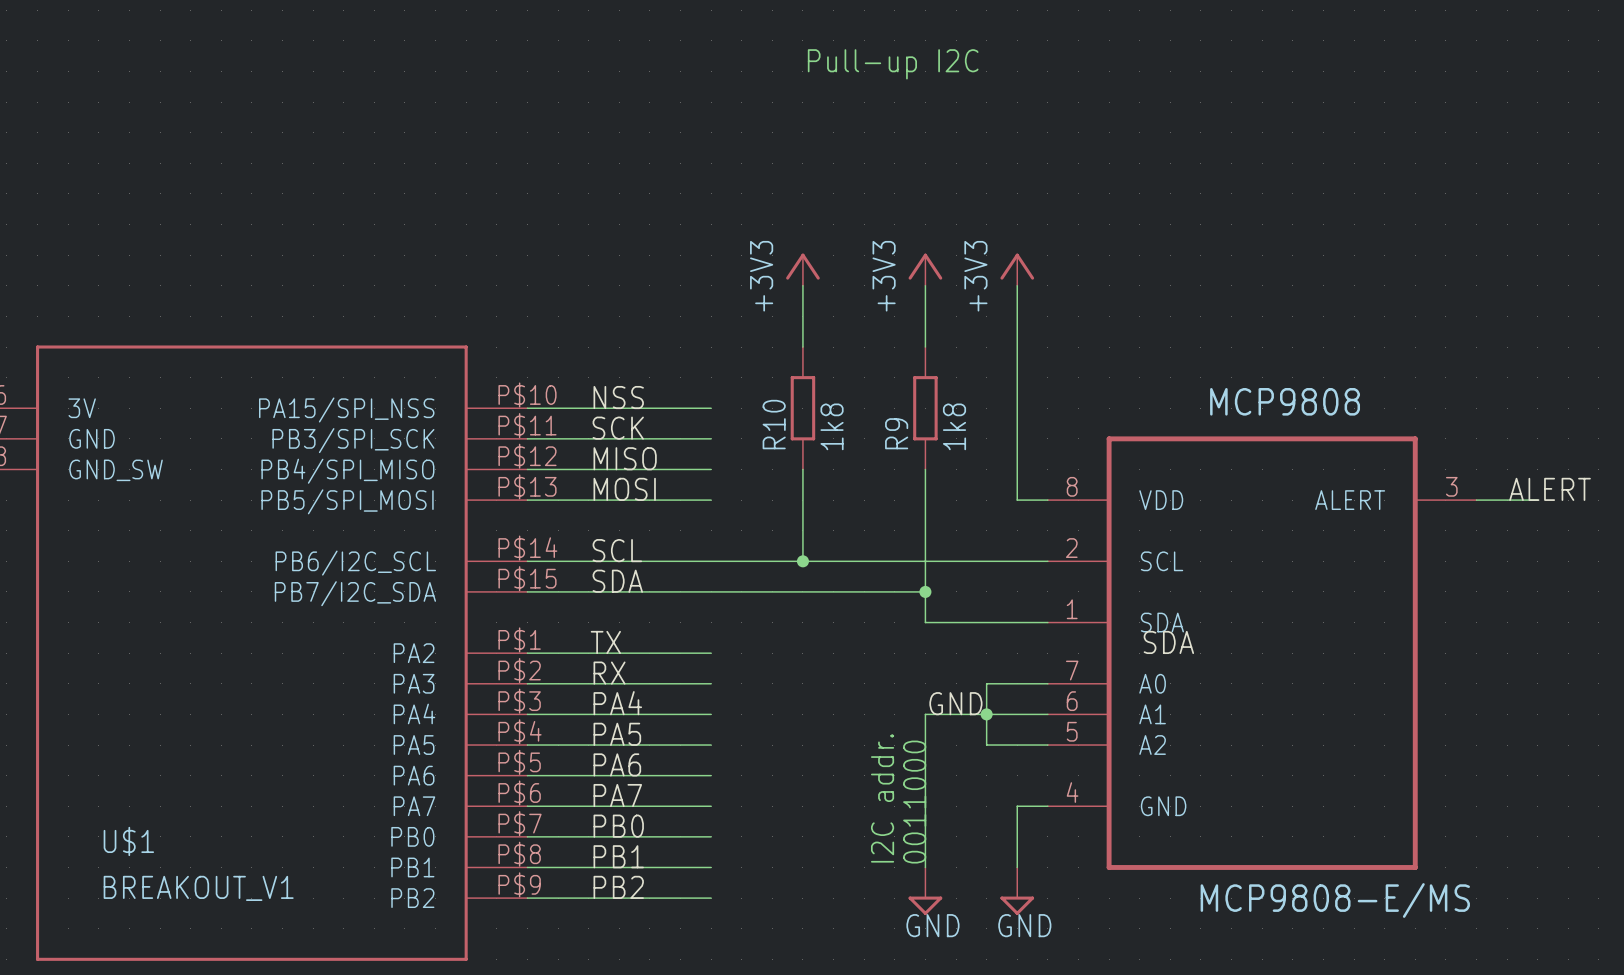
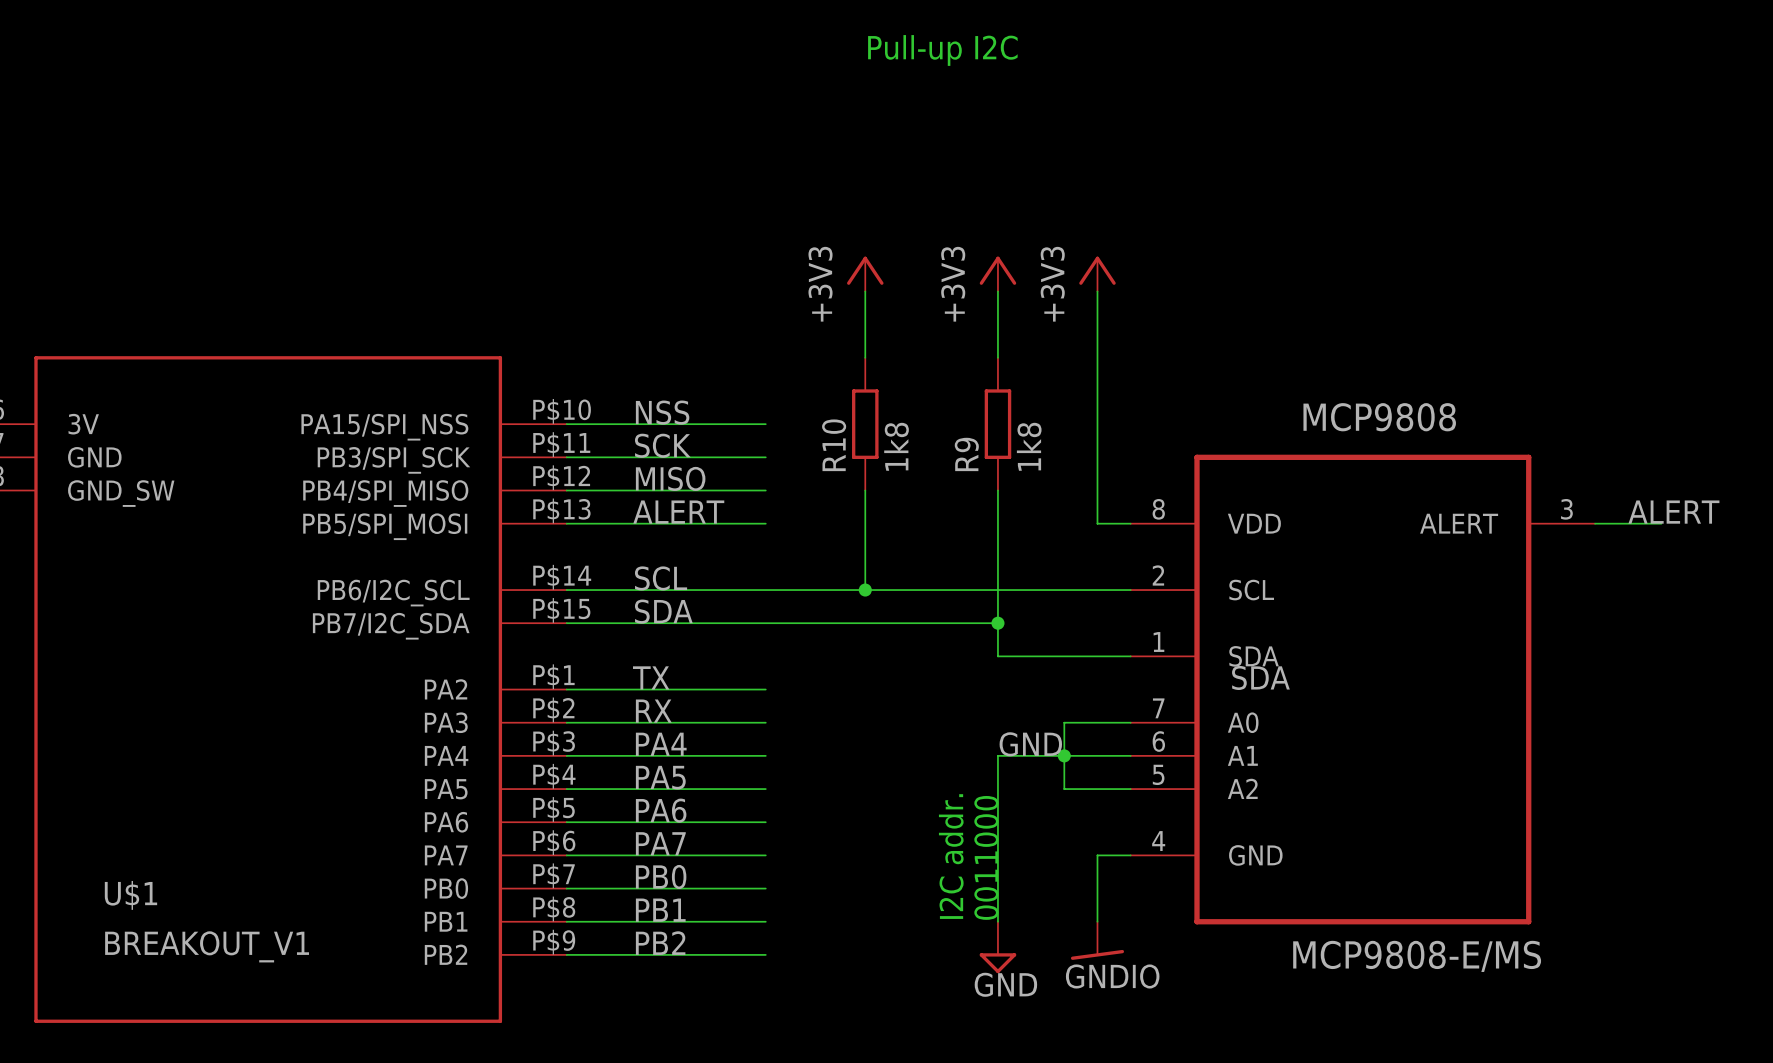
label: MOSI (624, 489) -> ALERT (678, 512)
power symbol: GND (1017, 891) -> GNDIO (1097, 940)

